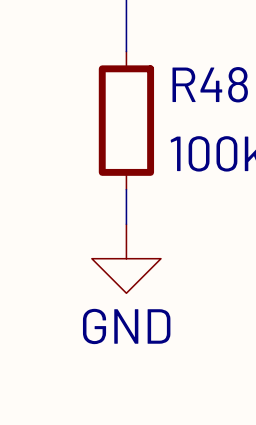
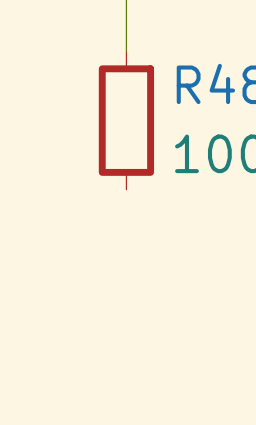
wire: (126, 189) (126, 224) -> none
power symbol: GND (126, 258) -> none

